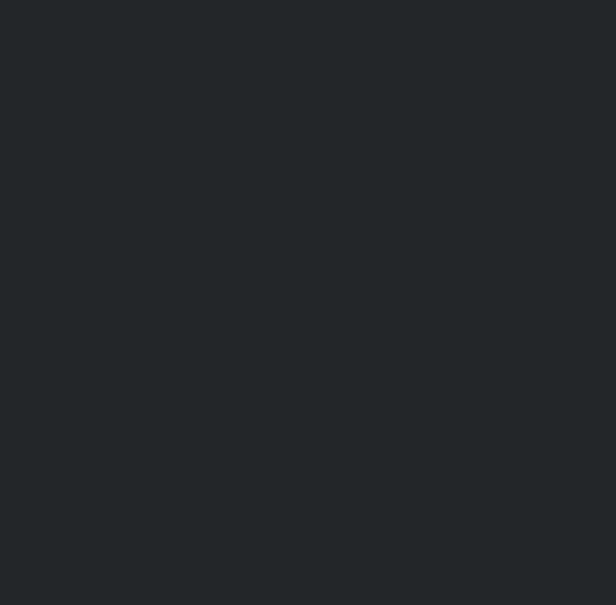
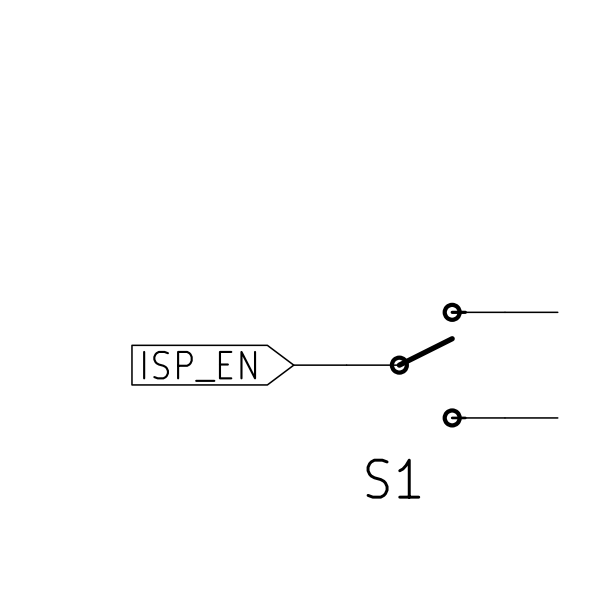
wire: none -> (504, 312) (557, 312)
global label: none -> ISP_EN (199, 366)
wire: none -> (293, 365) (346, 365)
S1: none -> (425, 365)
wire: none -> (504, 417) (557, 417)

